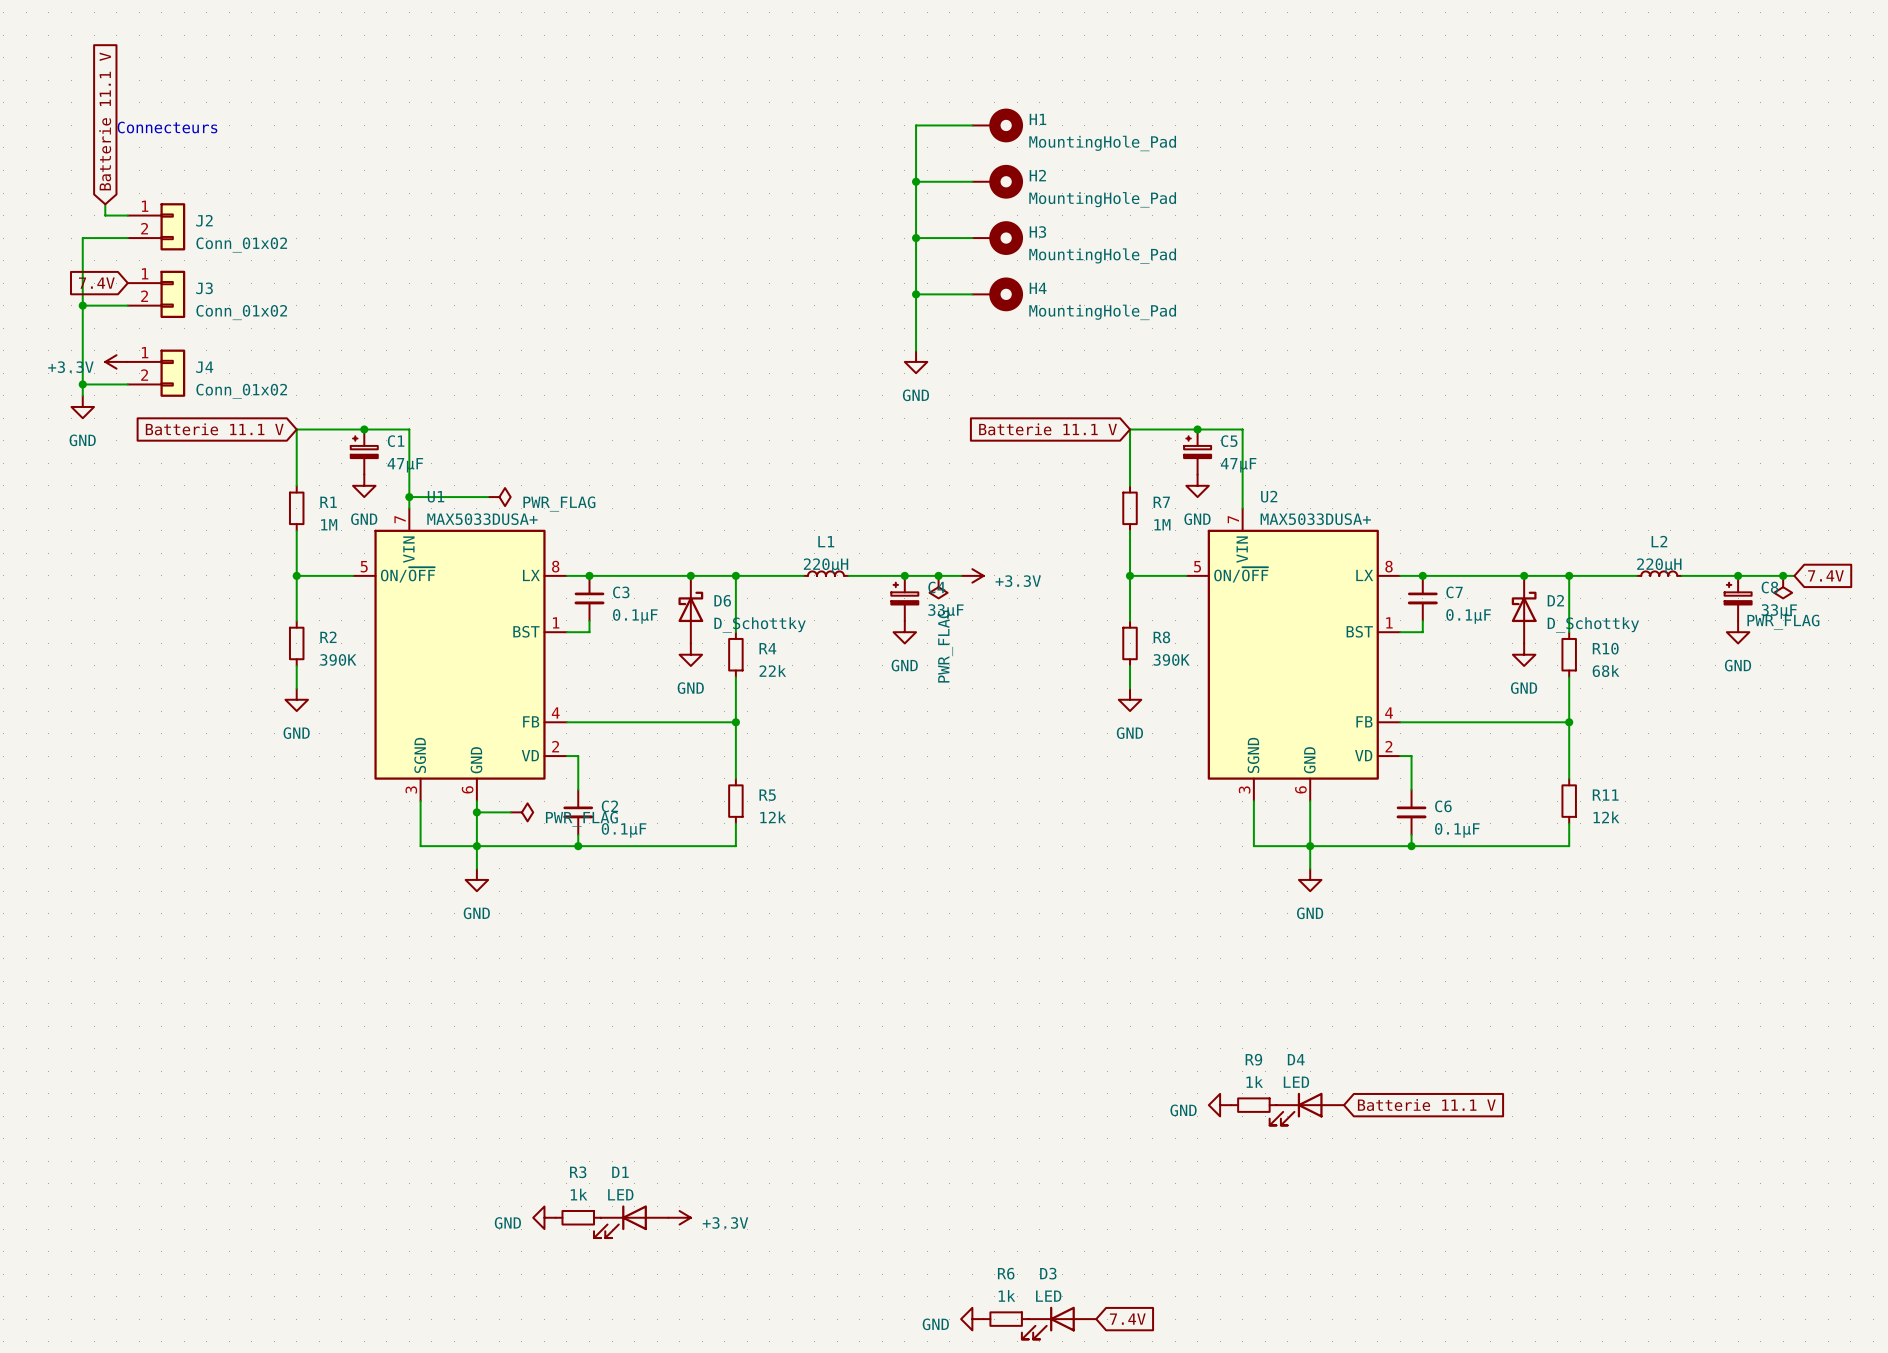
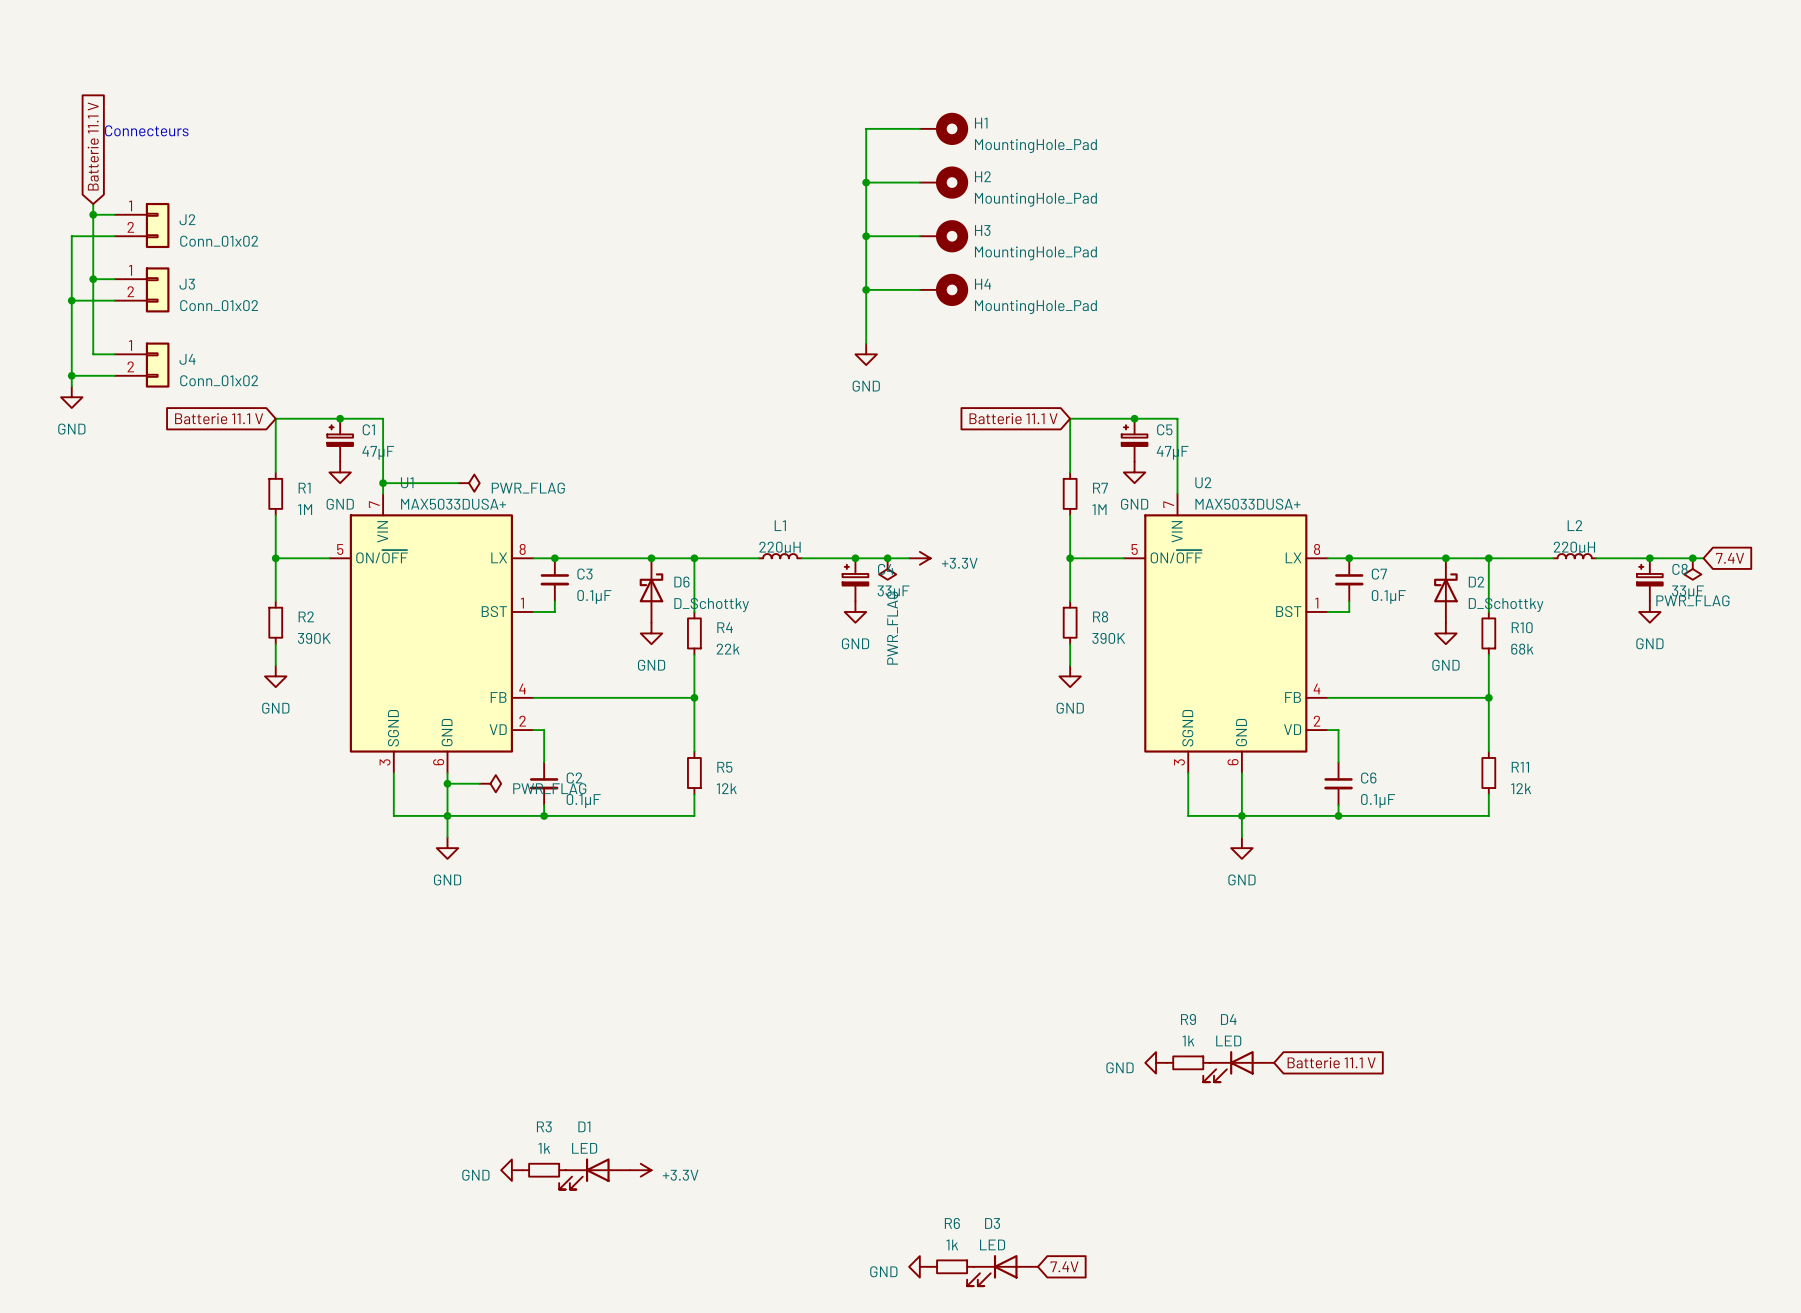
wire: none -> (93, 214) (93, 354) (114, 354)
junction: none -> (93, 214)
global label: 7.4V (96, 283) -> none
wire: none -> (93, 279) (114, 279)
junction: none -> (93, 279)
power symbol: +3.3V (116, 361) -> none

